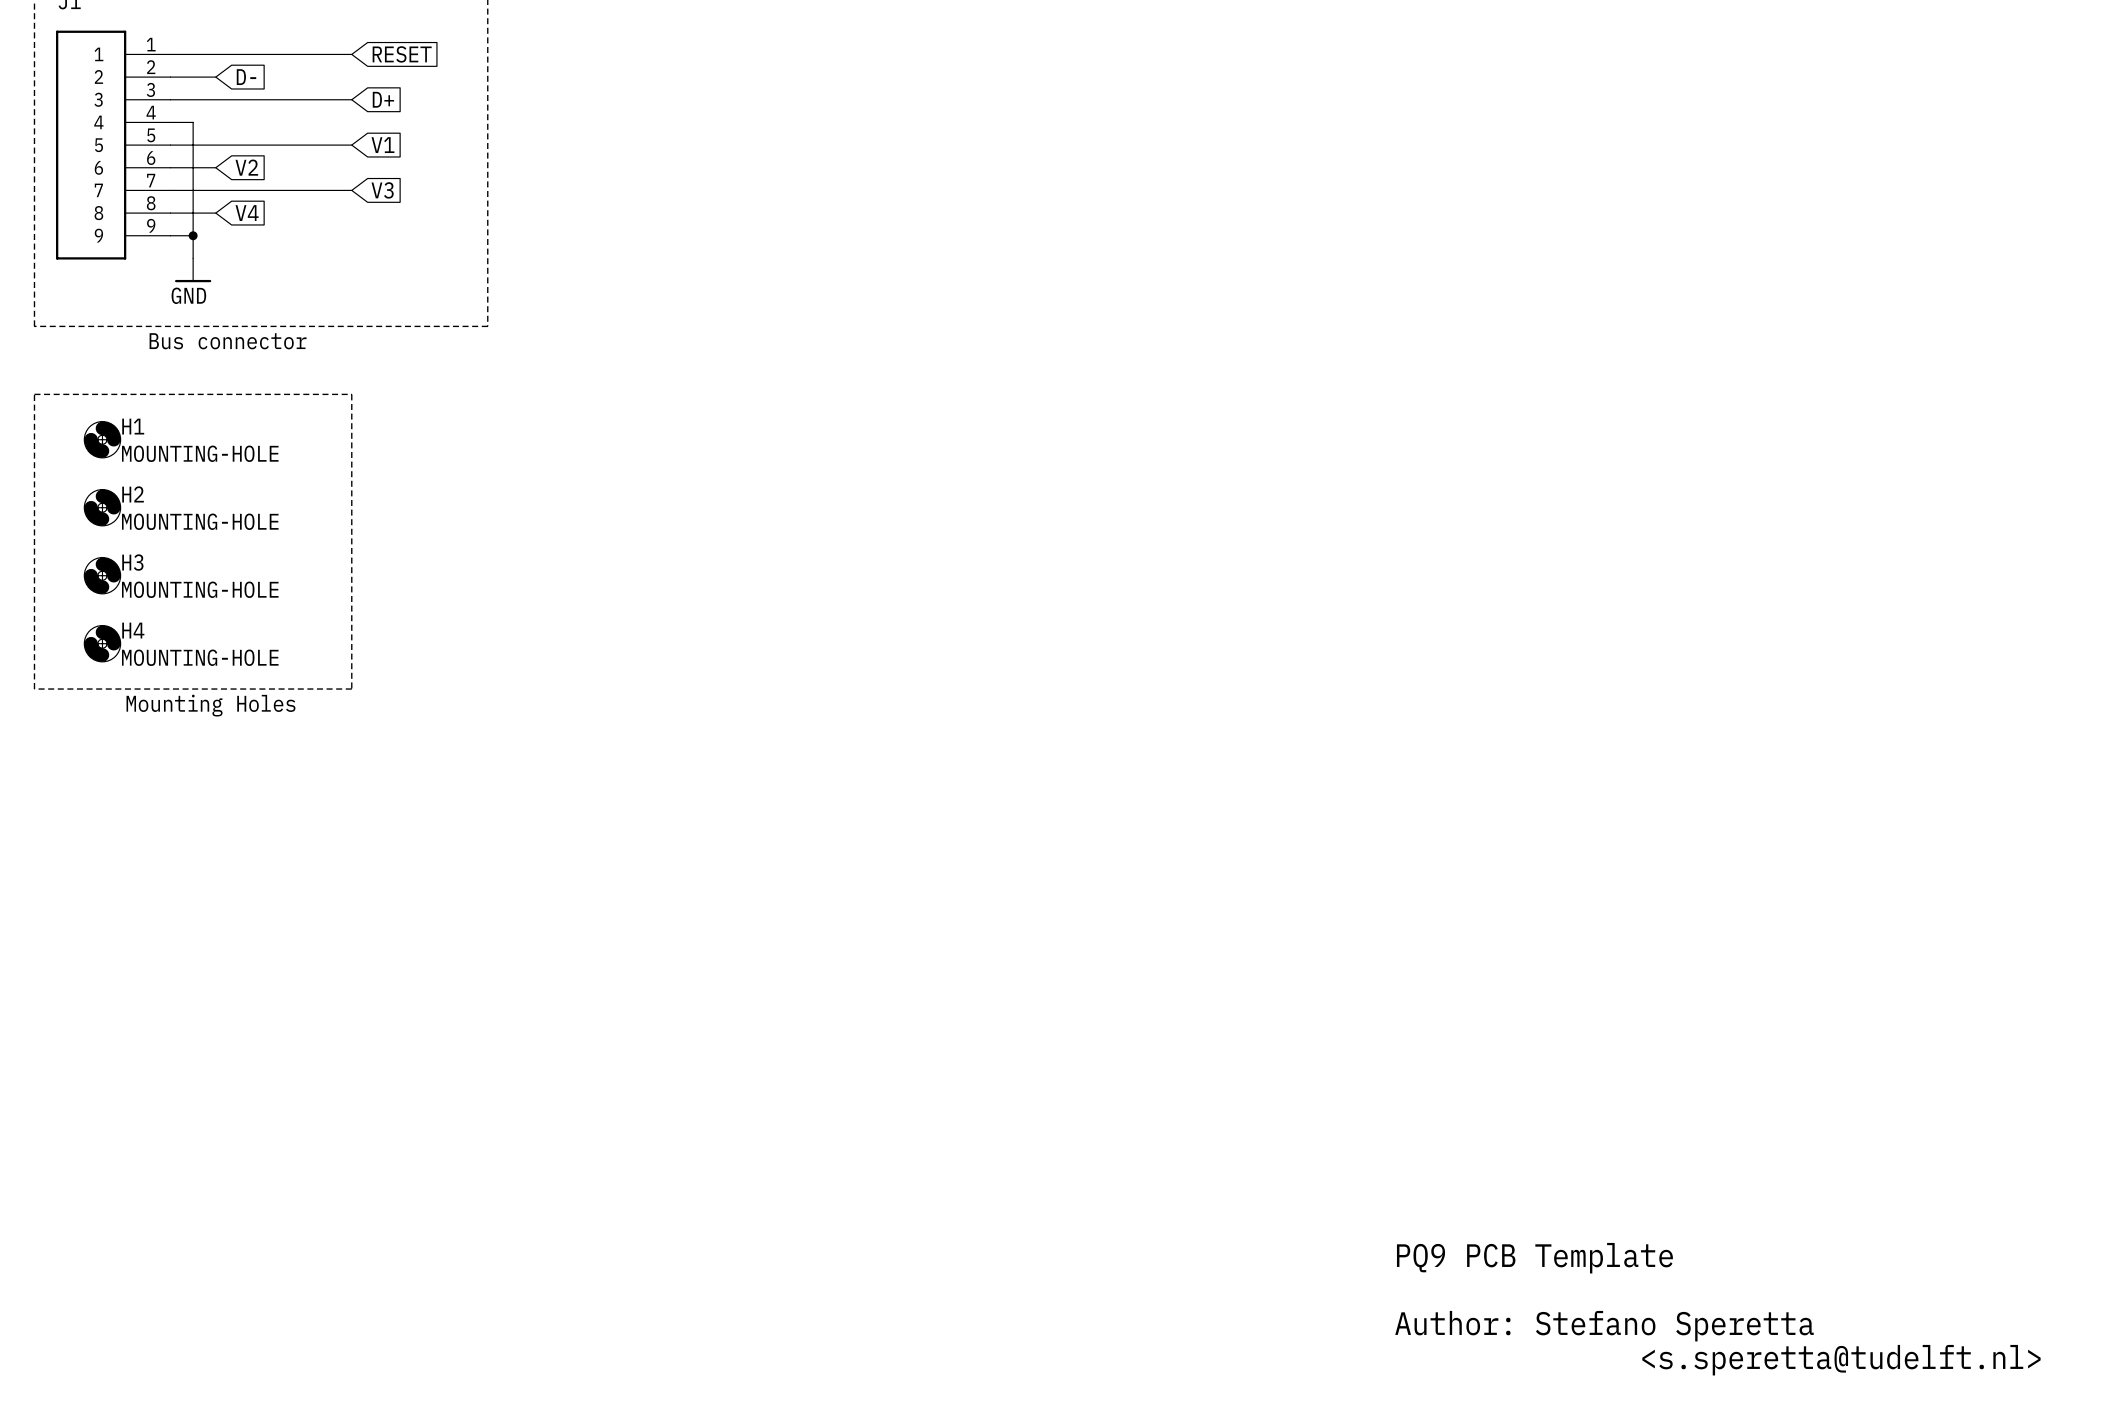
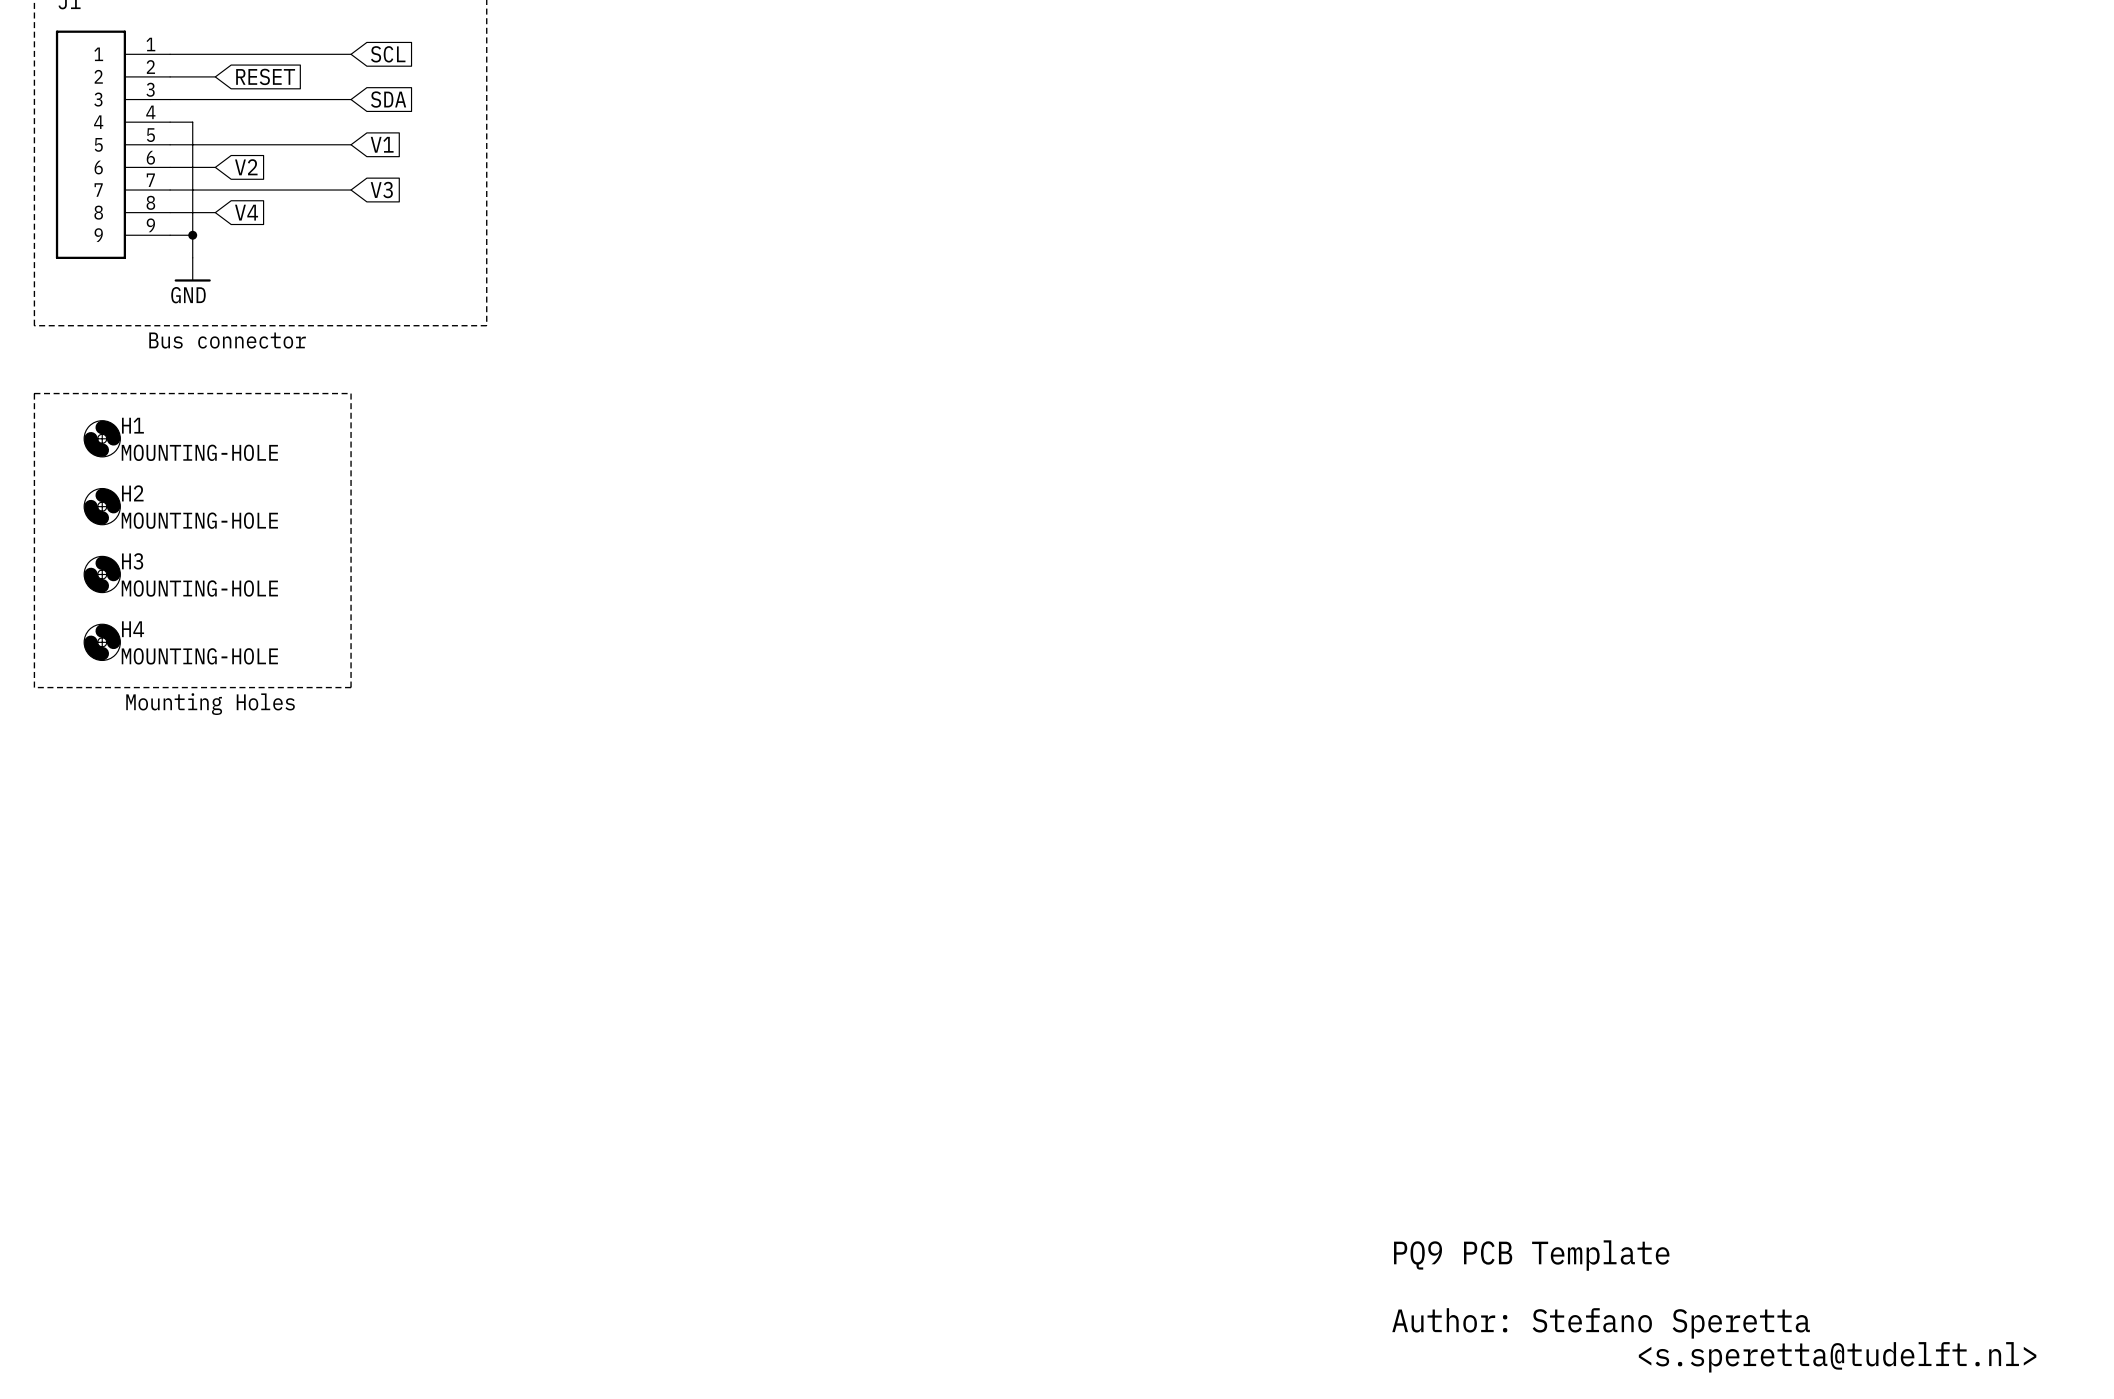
global label: RESET (402, 54) -> SCL (388, 54)
global label: D- (246, 77) -> RESET (265, 76)
global label: D+ (383, 99) -> SDA (388, 99)

